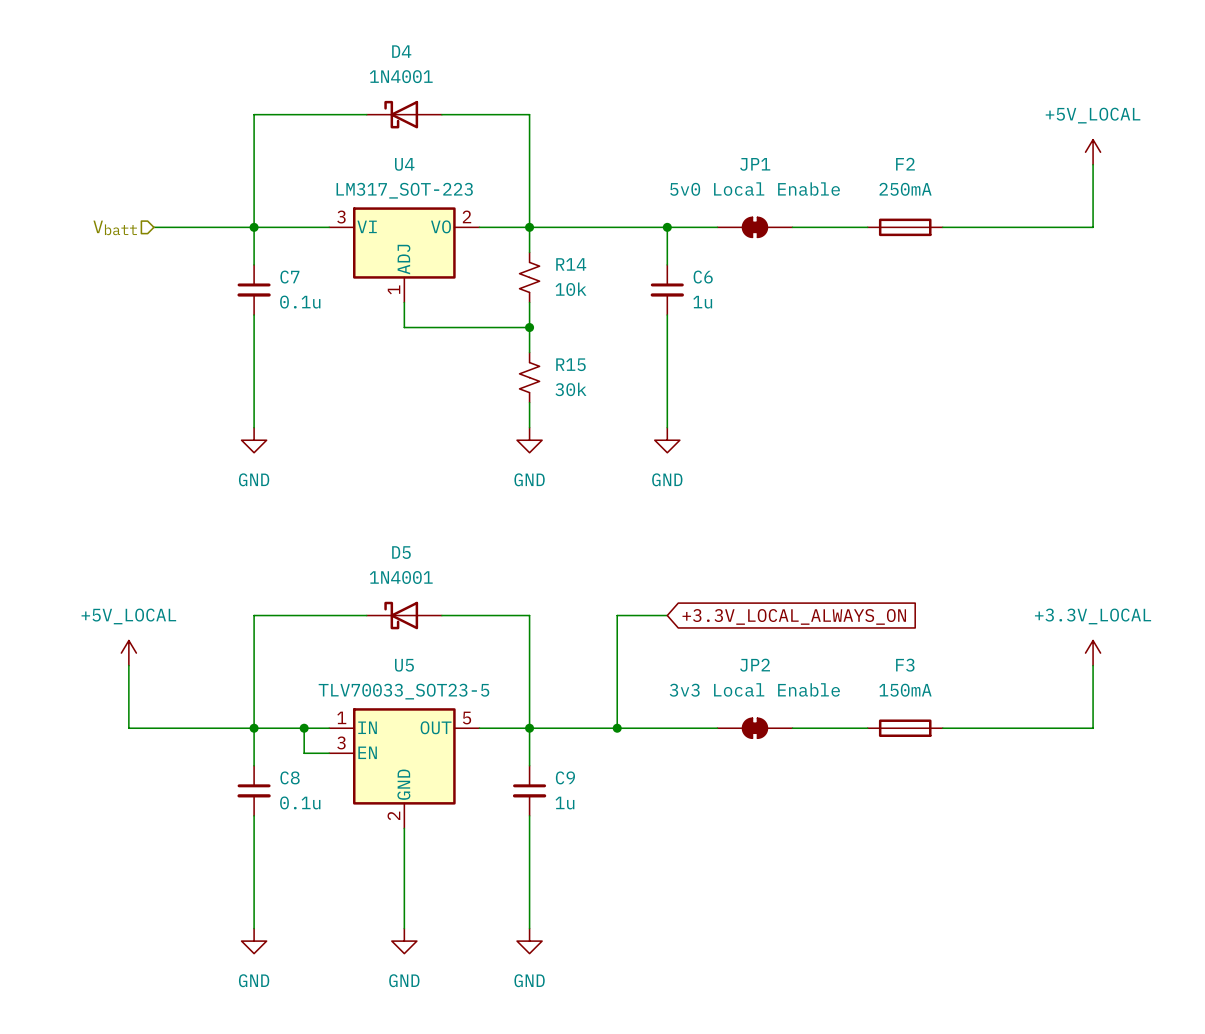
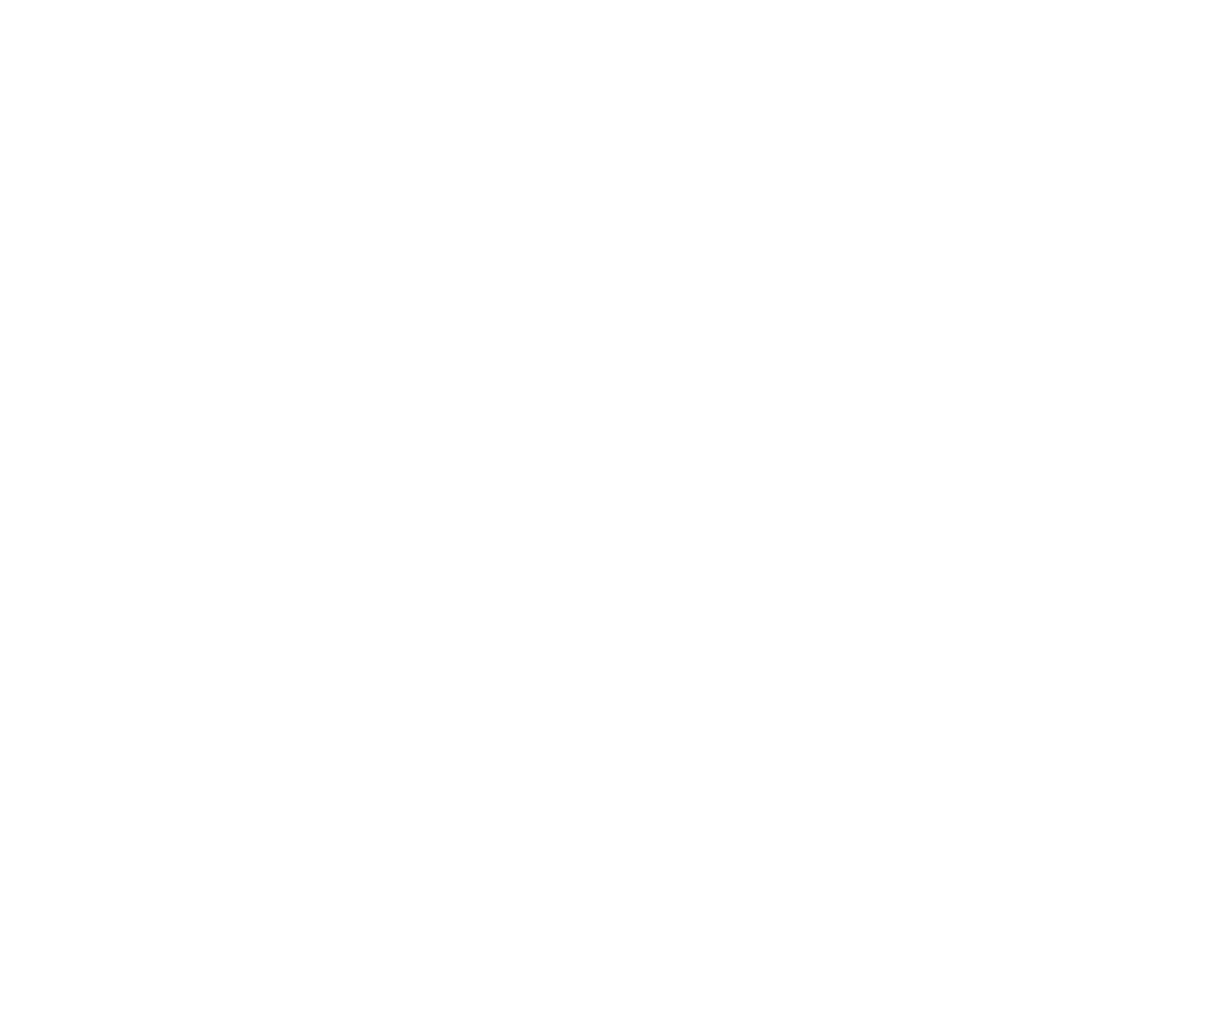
wire: (366, 114) (254, 114) (254, 264) -> none
D4: 1N4001 (404, 114) -> none
wire: (441, 114) (529, 114) (529, 252) -> none
power symbol: +5V_LOCAL (1093, 152) -> none
wire: (1093, 164) (1093, 227) (942, 227) -> none
hierarchical label: Vbatt (115, 227) -> none
wire: (153, 227) (329, 227) -> none
junction: (254, 227) -> none
wire: (479, 227) (717, 227) -> none
junction: (529, 227) -> none
wire: (667, 227) (667, 264) -> none
junction: (667, 227) -> none
JP1: 5v0 Local Enable (754, 227) -> none
wire: (792, 227) (867, 227) -> none
F2: 250mA (905, 227) -> none
U4: LM317_SOT-223 (404, 254) -> none
R14: 10k (529, 277) -> none
C7: 0.1u (254, 289) -> none
C6: 1u (667, 289) -> none
wire: (404, 302) (404, 327) (529, 327) -> none
wire: (529, 302) (529, 352) -> none
wire: (254, 315) (254, 427) -> none
wire: (667, 315) (667, 427) -> none
junction: (529, 327) -> none
R15: 30k (529, 377) -> none
wire: (529, 402) (529, 427) -> none
power symbol: GND (254, 440) -> none
power symbol: GND (529, 440) -> none
power symbol: GND (667, 440) -> none
wire: (366, 615) (254, 615) (254, 765) -> none
D5: 1N4001 (404, 615) -> none
wire: (441, 615) (529, 615) (529, 765) -> none
wire: (667, 615) (617, 615) (617, 728) -> none
global label: +3.3V_LOCAL_ALWAYS_ON (794, 616) -> none
power symbol: +5V_LOCAL (128, 653) -> none
power symbol: +3.3V_LOCAL (1093, 653) -> none
wire: (128, 665) (128, 728) (329, 728) -> none
wire: (1093, 665) (1093, 728) (942, 728) -> none
junction: (254, 728) -> none
wire: (304, 728) (304, 753) (329, 753) -> none
junction: (304, 728) -> none
wire: (479, 728) (717, 728) -> none
junction: (529, 728) -> none
junction: (617, 728) -> none
JP2: 3v3 Local Enable (754, 728) -> none
wire: (792, 728) (867, 728) -> none
F3: 150mA (905, 728) -> none
U5: TLV70033_SOT23-5 (404, 768) -> none
C8: 0.1u (254, 790) -> none
C9: 1u (529, 790) -> none
wire: (254, 815) (254, 928) -> none
wire: (529, 815) (529, 928) -> none
wire: (404, 828) (404, 928) -> none
power symbol: GND (254, 941) -> none
power symbol: GND (404, 941) -> none
power symbol: GND (529, 941) -> none

